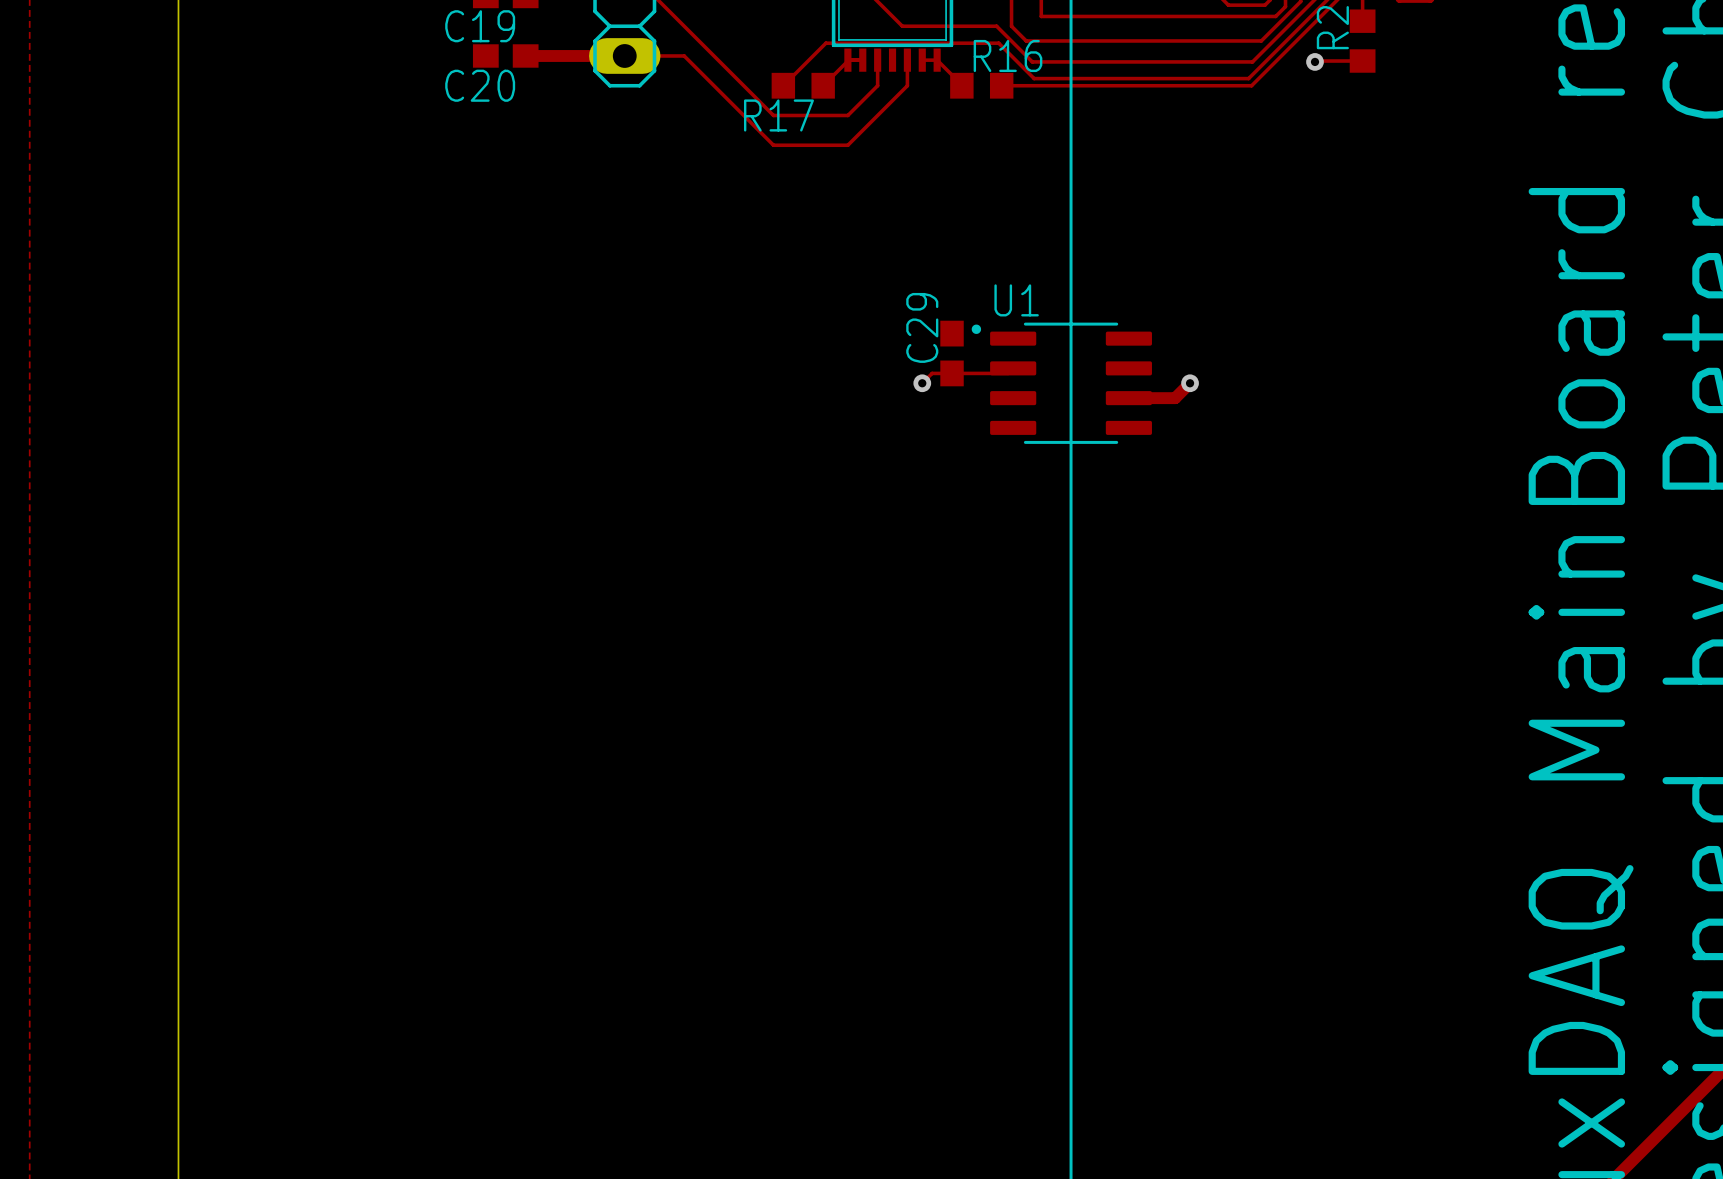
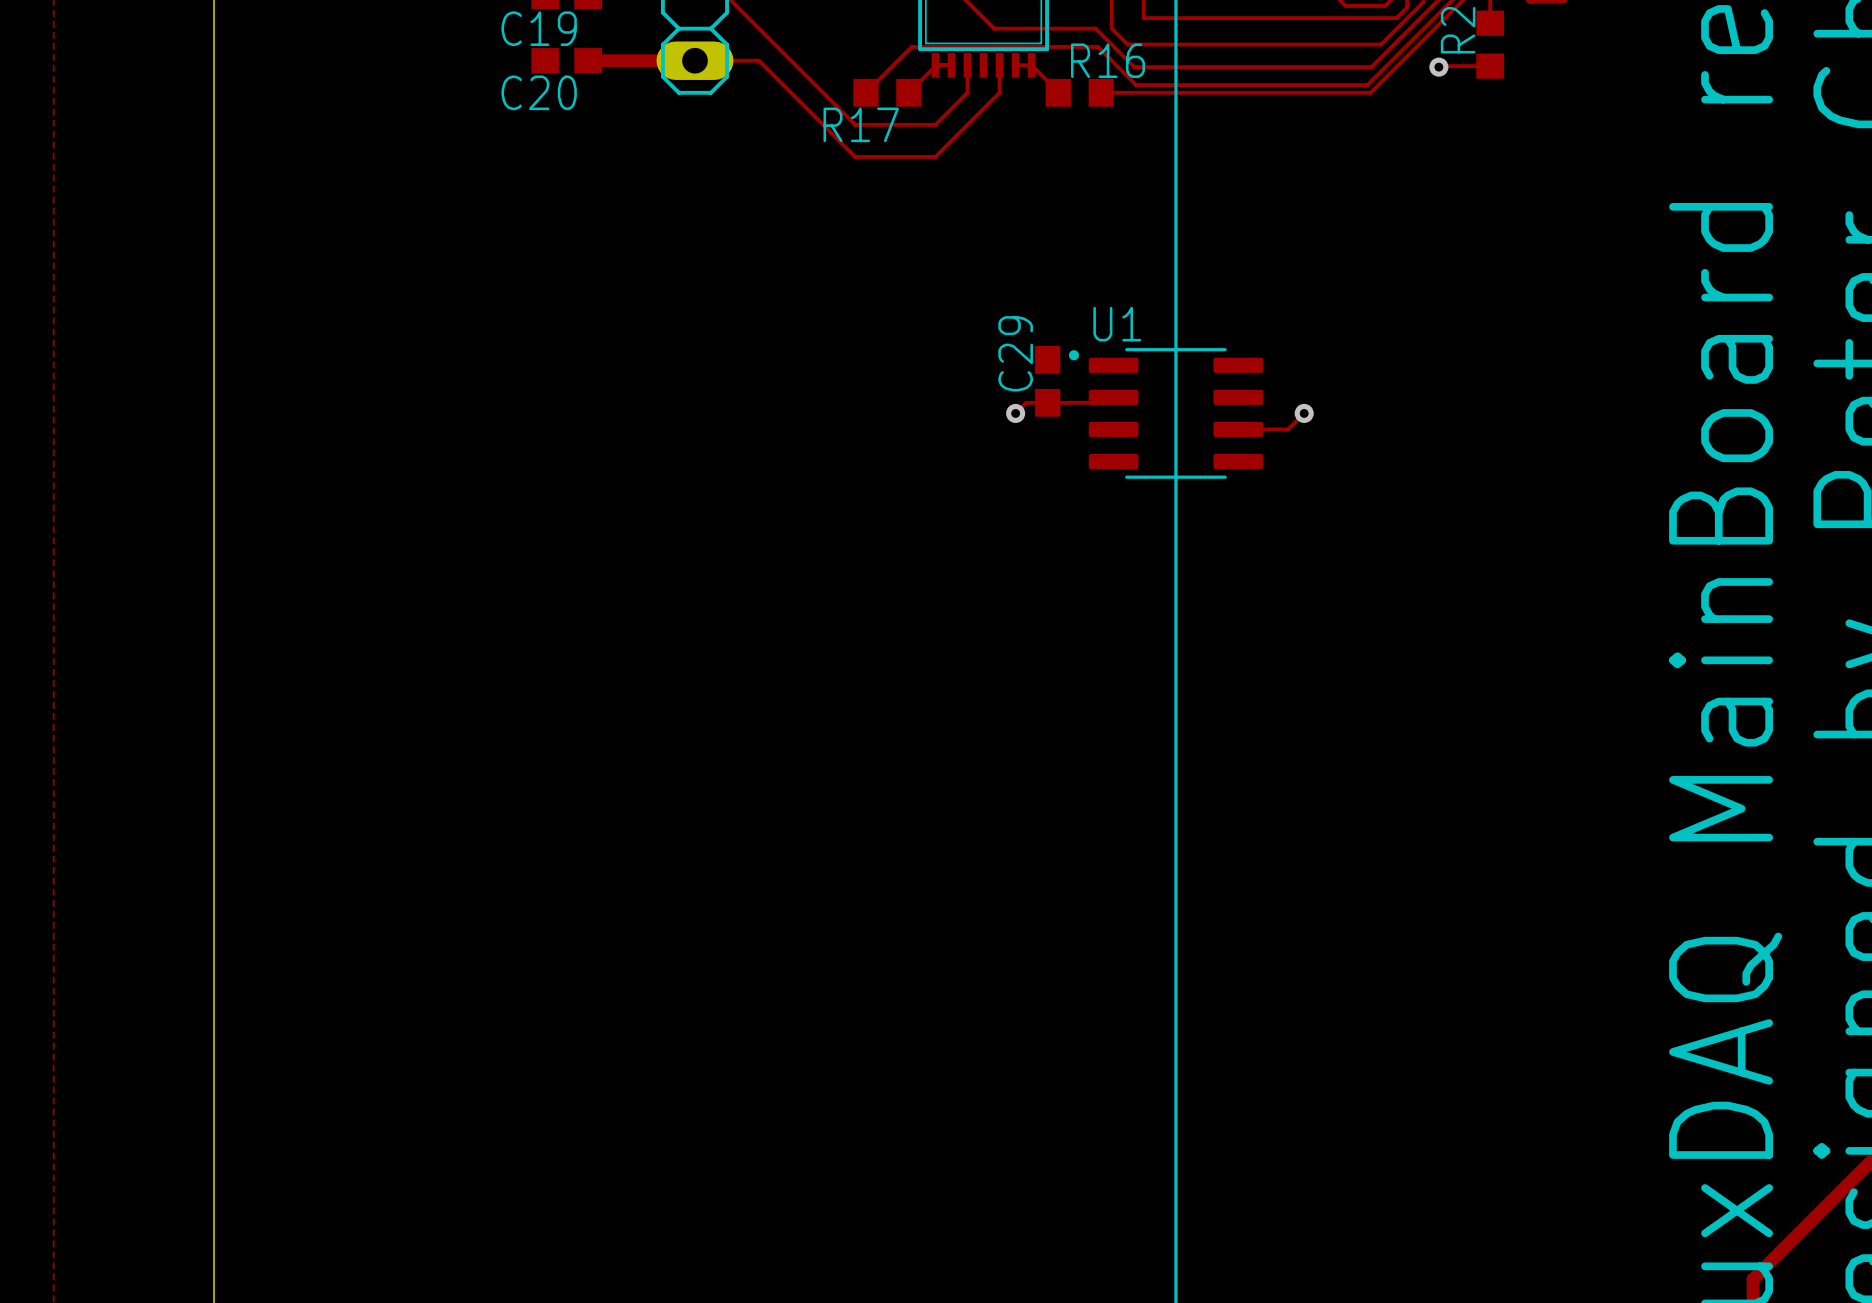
track width: thick (1190, 383) (1175, 398) (1128, 398) -> thin (1304, 413) (1288, 429) (1238, 429)

